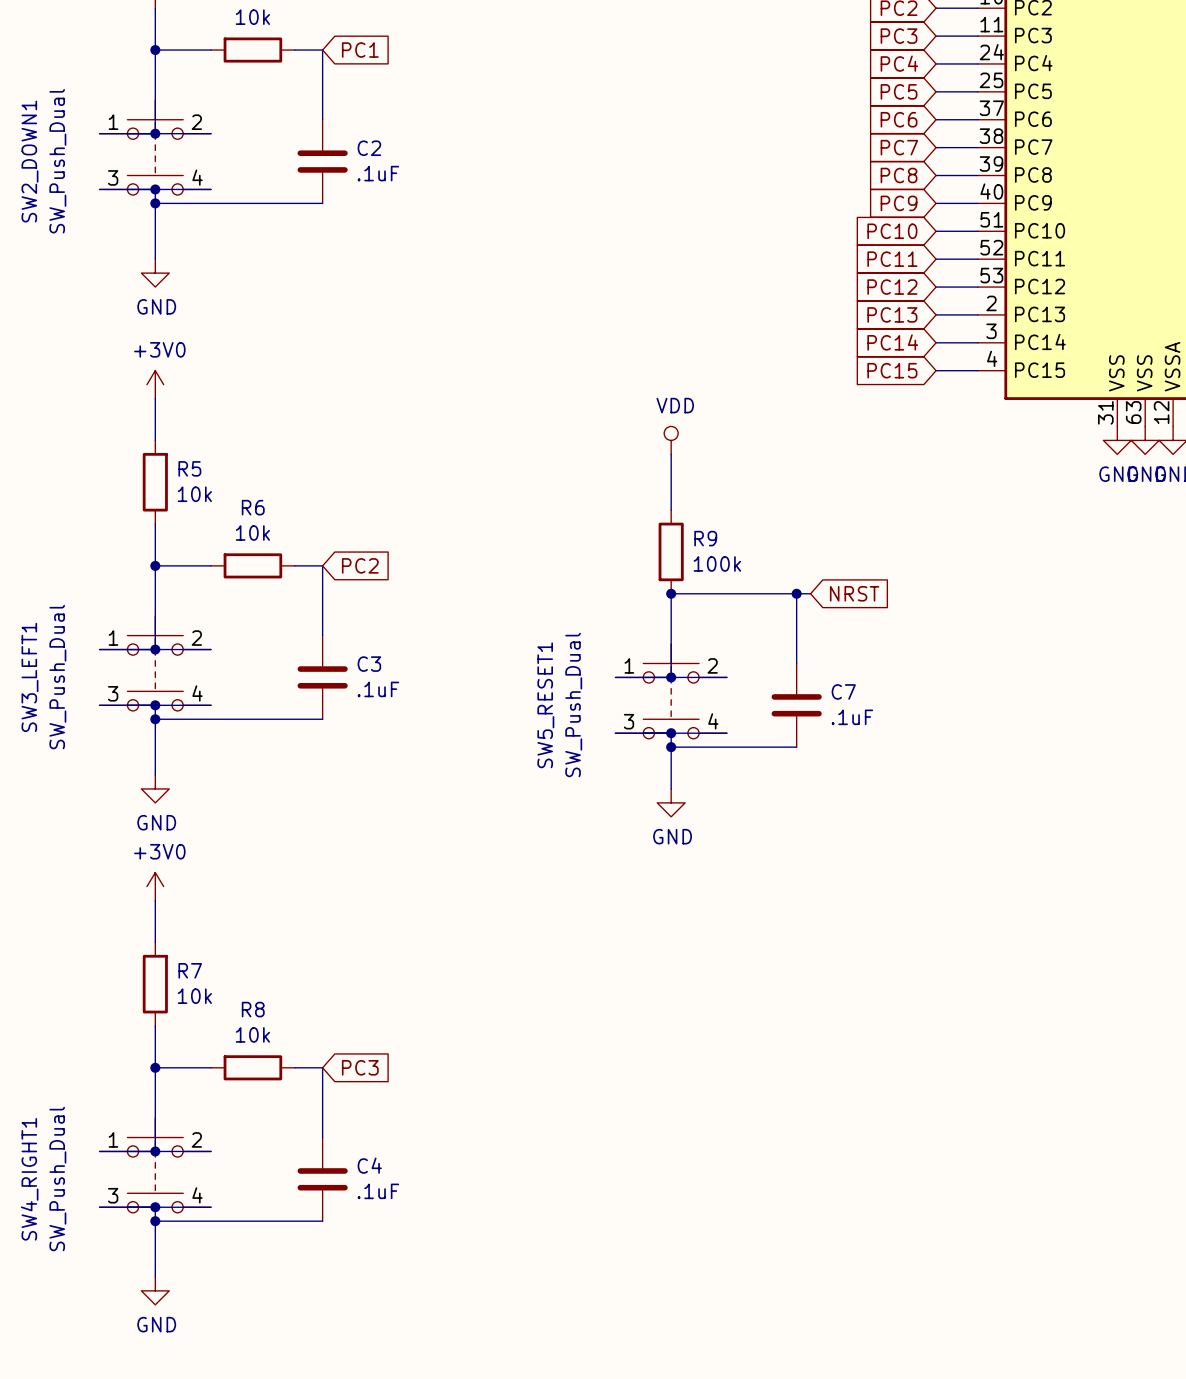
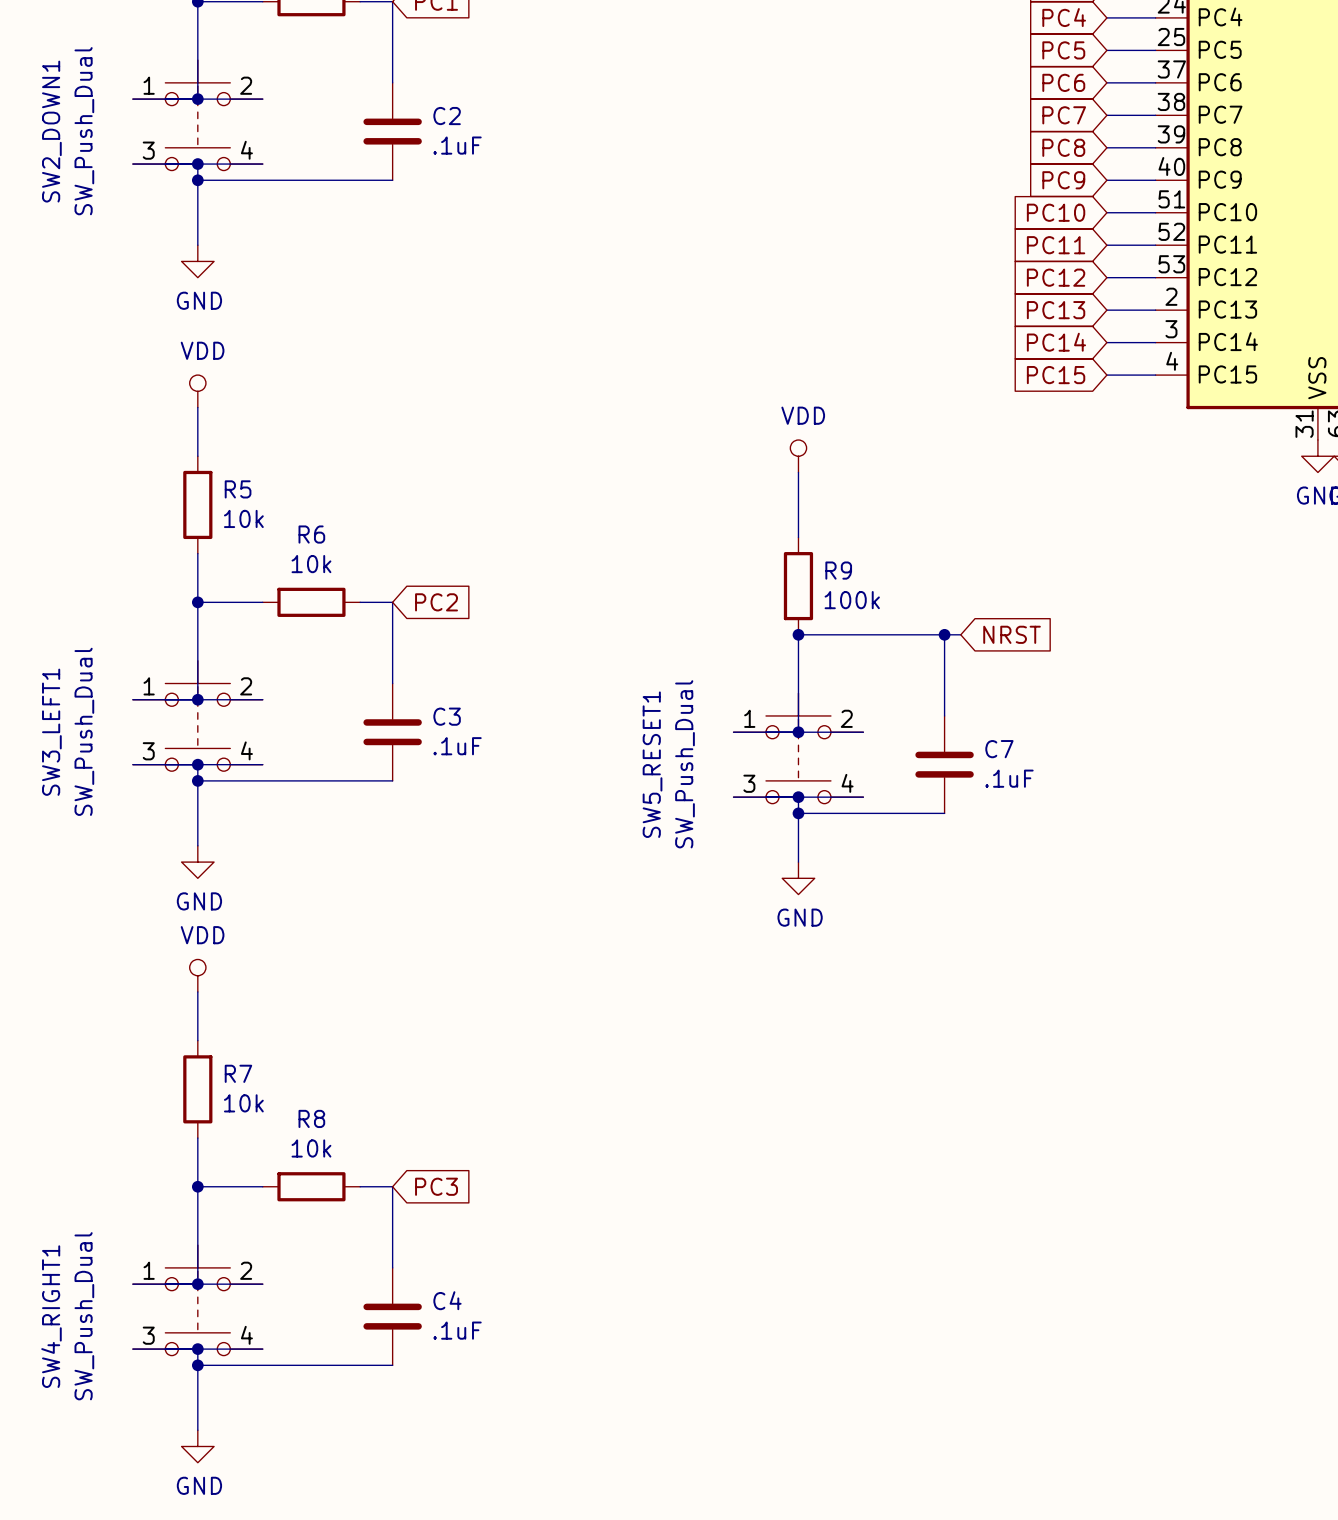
power symbol: +3V0 (155, 384) -> VDD (197, 391)
power symbol: +3V0 (155, 886) -> VDD (197, 975)

